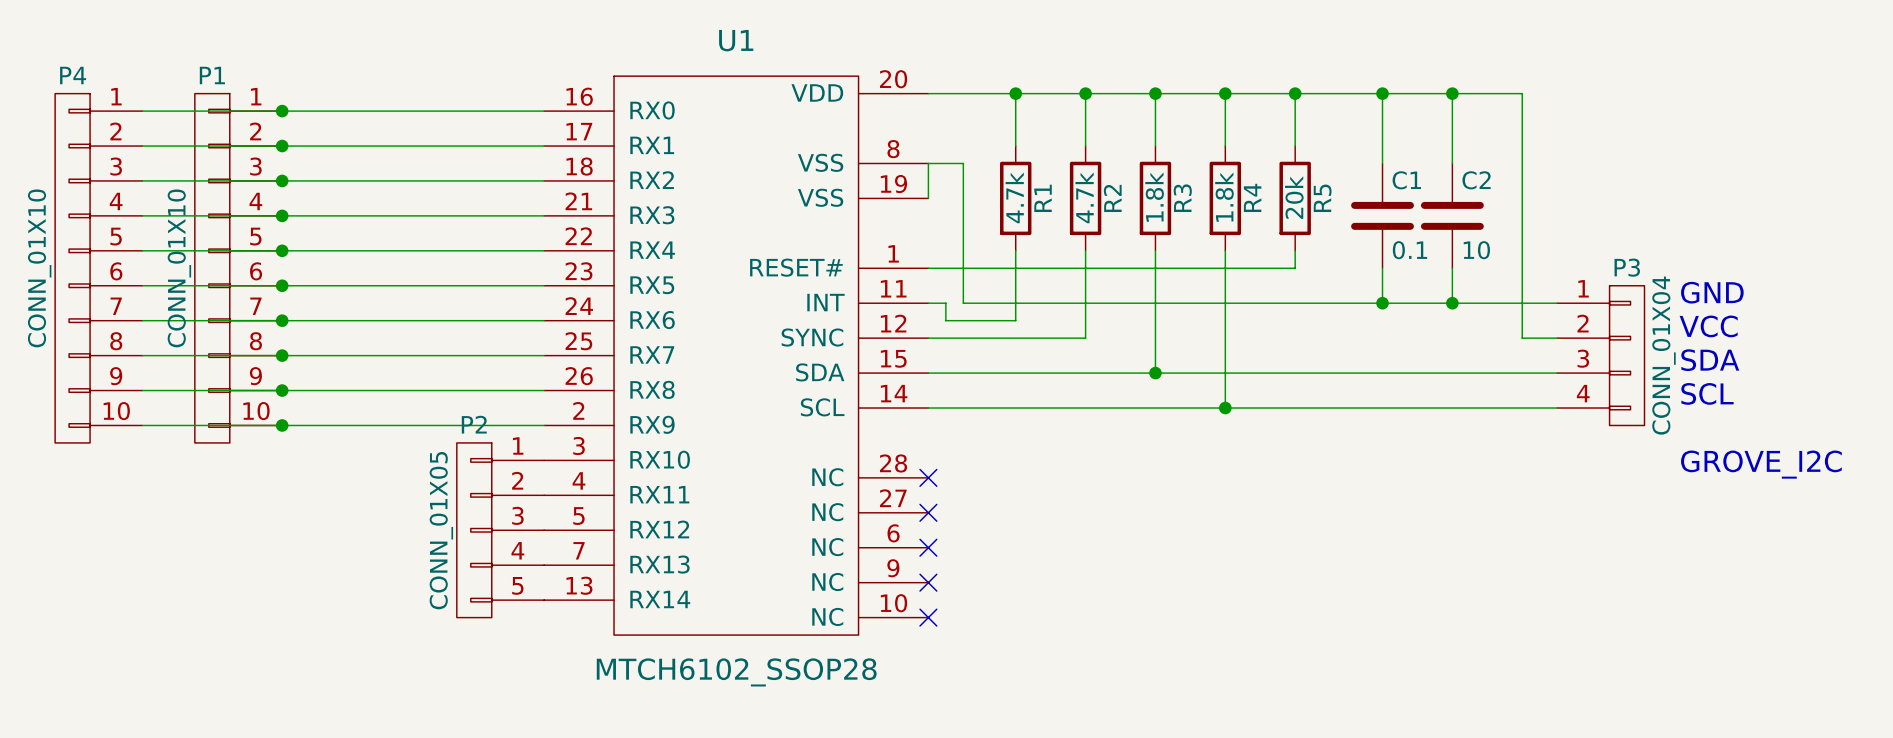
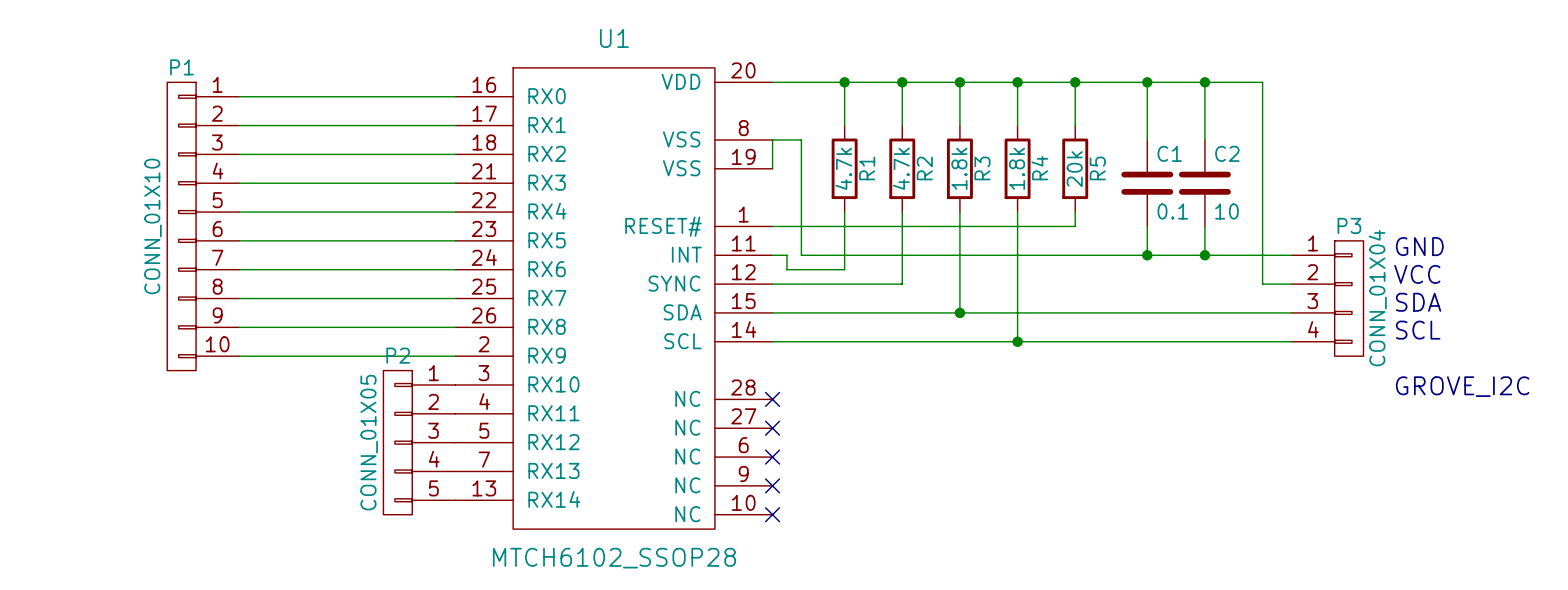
wire: (142, 111) (282, 111) -> none
junction: (282, 111) -> none
wire: (142, 146) (282, 146) -> none
junction: (282, 146) -> none
wire: (142, 180) (282, 180) -> none
junction: (282, 180) -> none
wire: (142, 215) (282, 215) -> none
junction: (282, 215) -> none
wire: (142, 250) (282, 250) -> none
junction: (282, 250) -> none
P4: CONN_01X10 (98, 268) -> none
wire: (142, 285) (282, 285) -> none
junction: (282, 285) -> none
wire: (142, 320) (282, 320) -> none
junction: (282, 320) -> none
wire: (142, 355) (282, 355) -> none
junction: (282, 355) -> none
wire: (142, 390) (282, 390) -> none
junction: (282, 390) -> none
wire: (142, 425) (282, 425) -> none
junction: (282, 425) -> none

